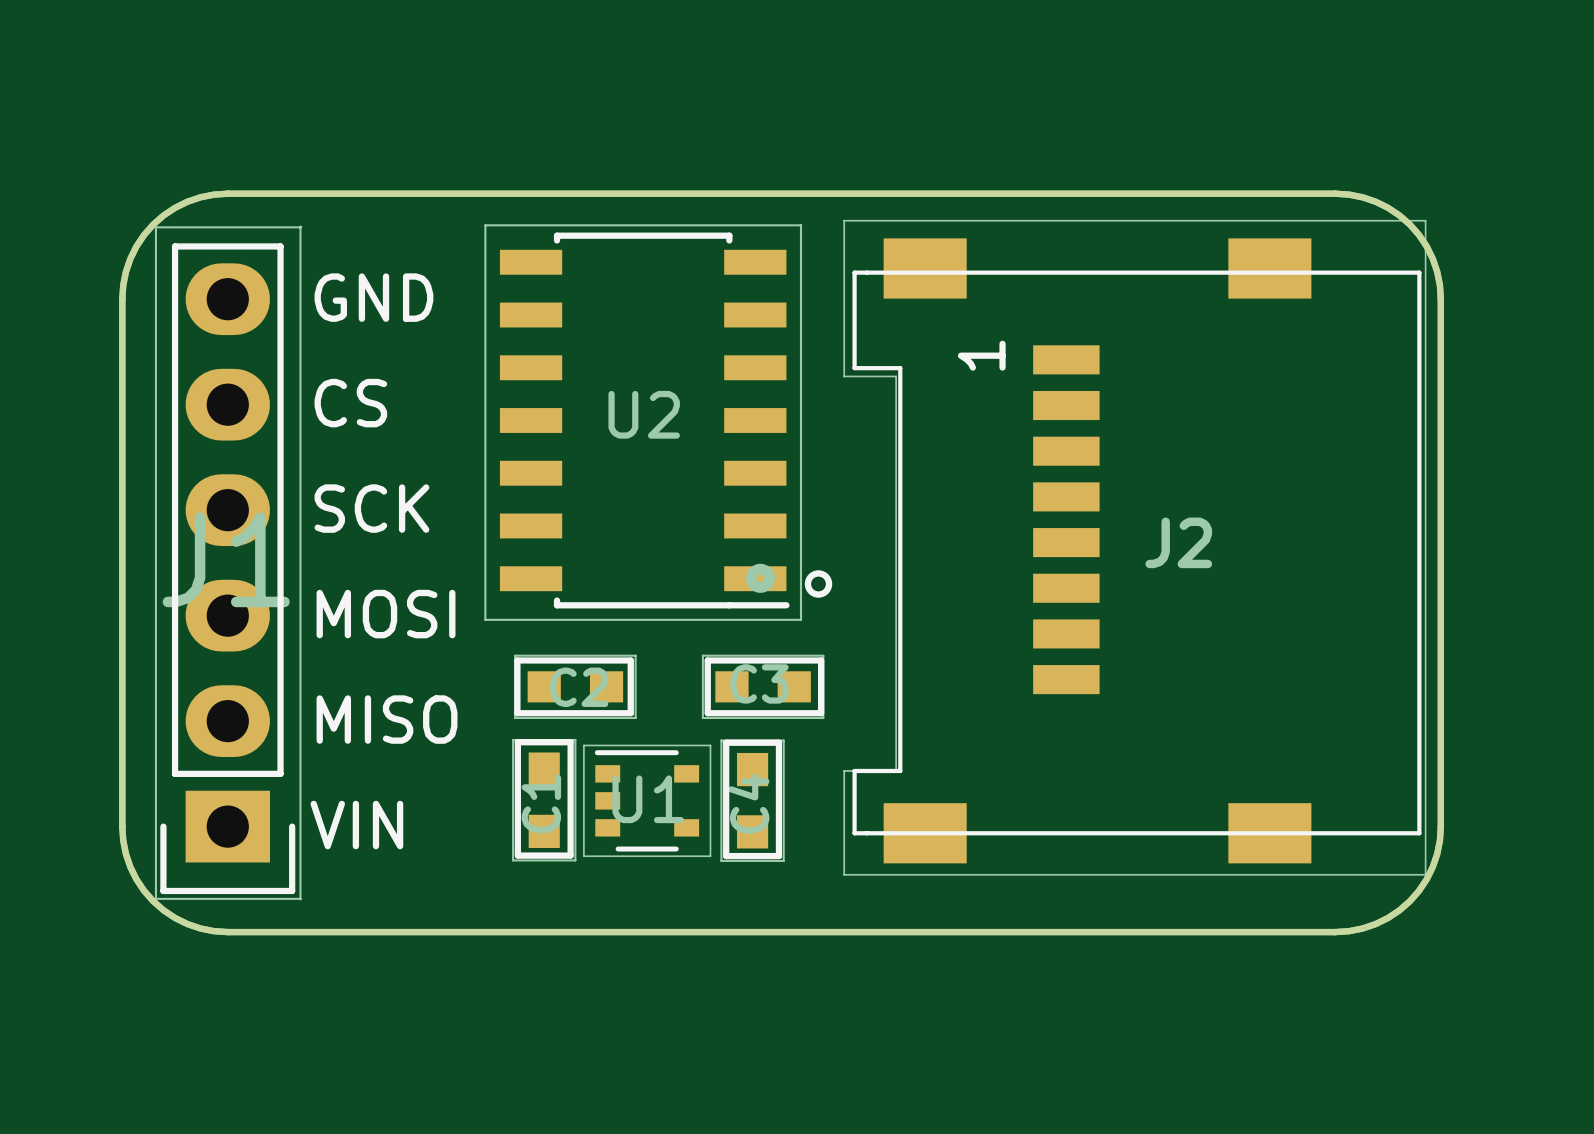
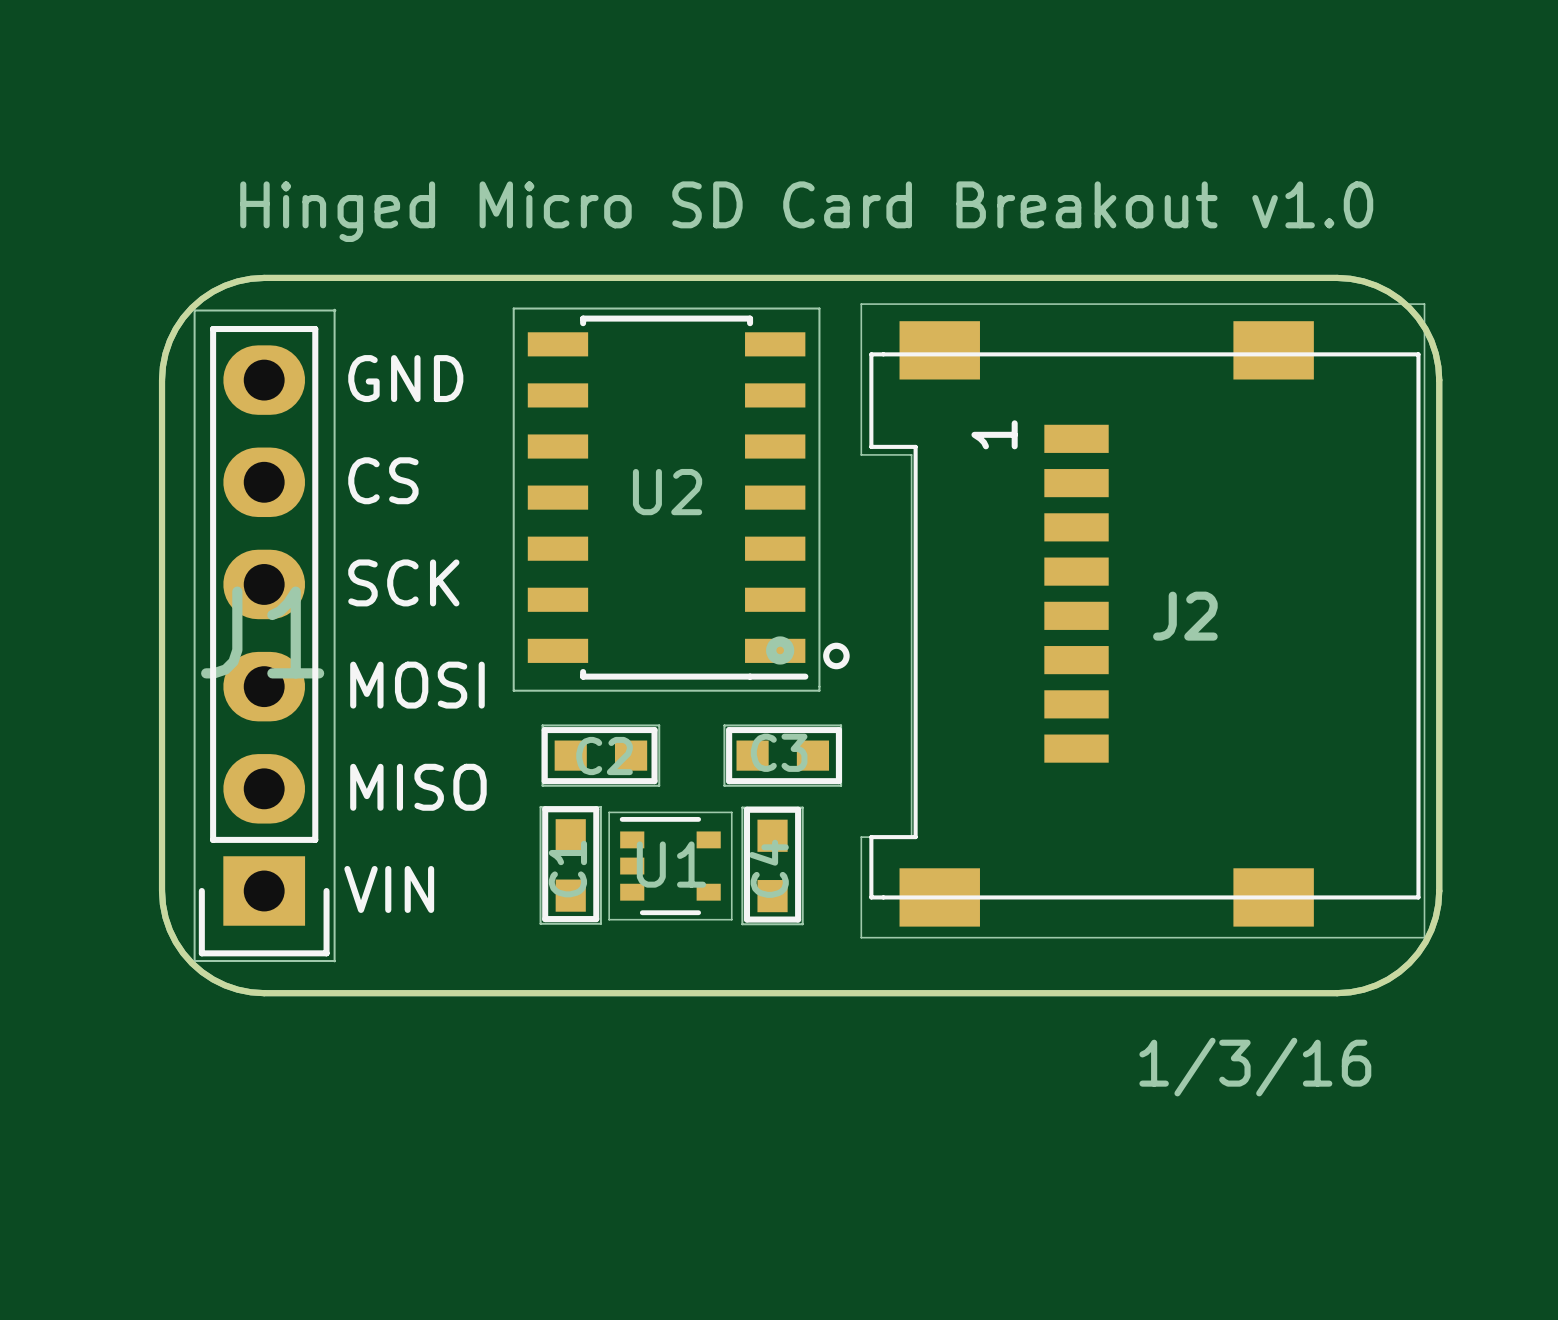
text: none -> Hinged Micro SD Card Breakout v1.0 (806, 211)
text: none -> 1/3/16 (1255, 1067)

